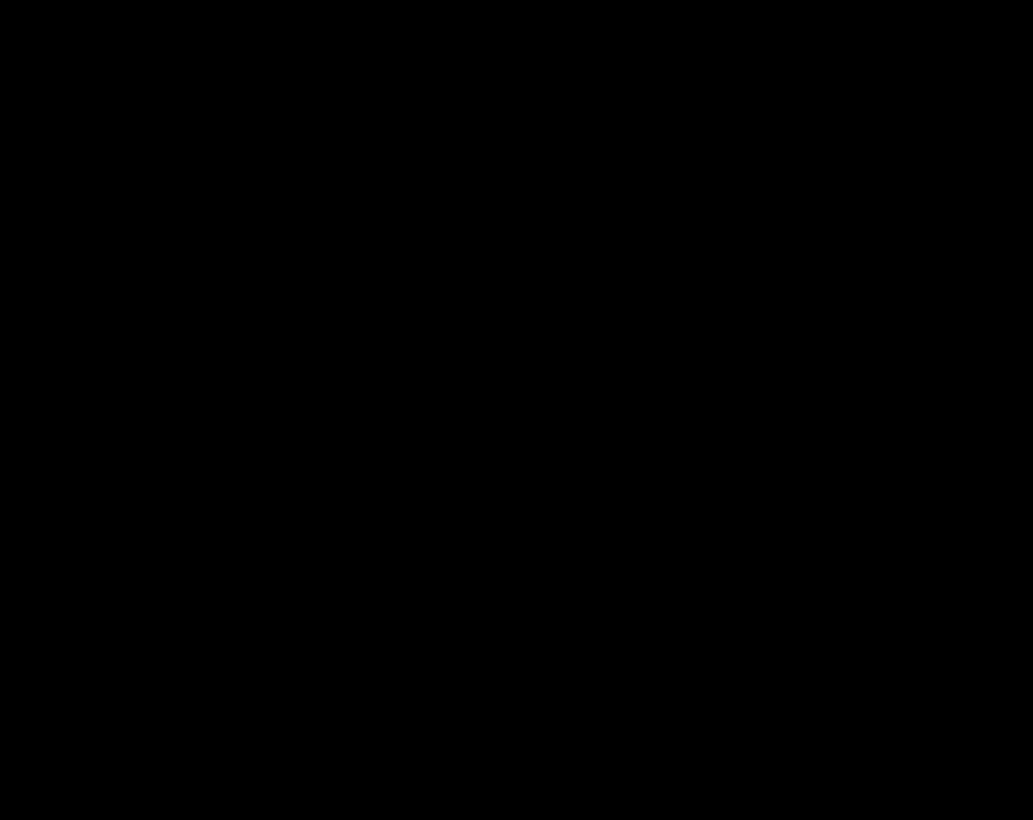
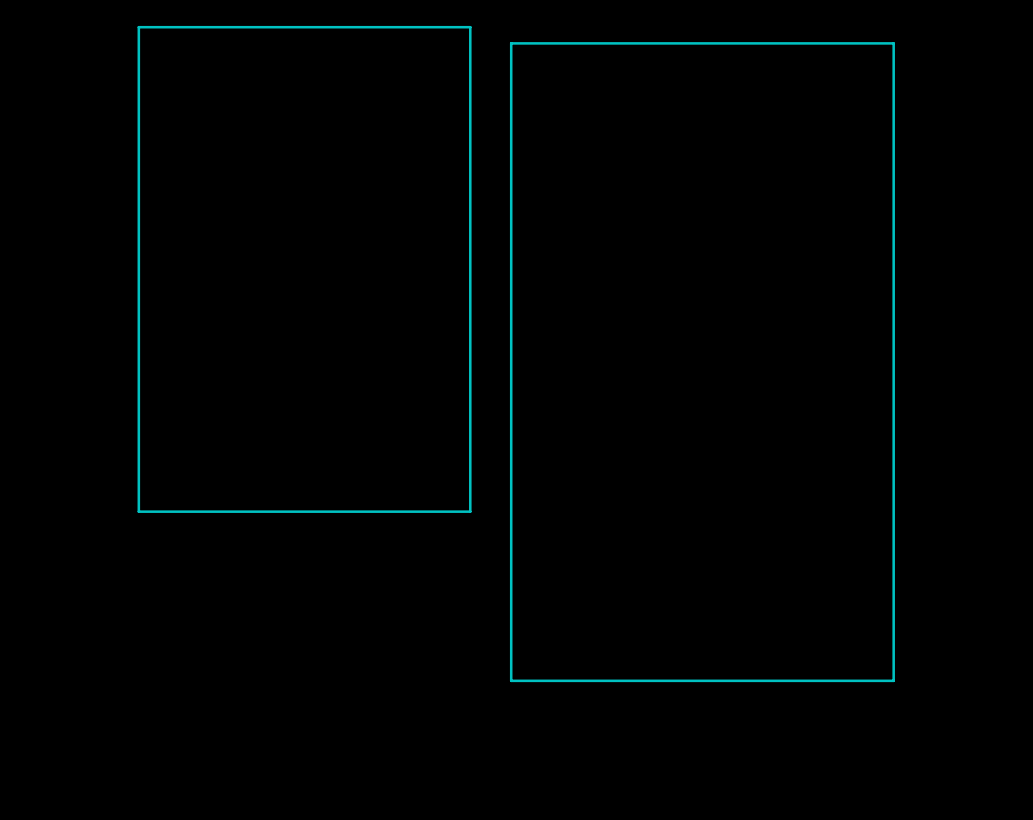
line: none -> (138, 27) (138, 511) (470, 511) (470, 27) (138, 27)
line: none -> (511, 43) (511, 680) (893, 680) (893, 43) (511, 43)

